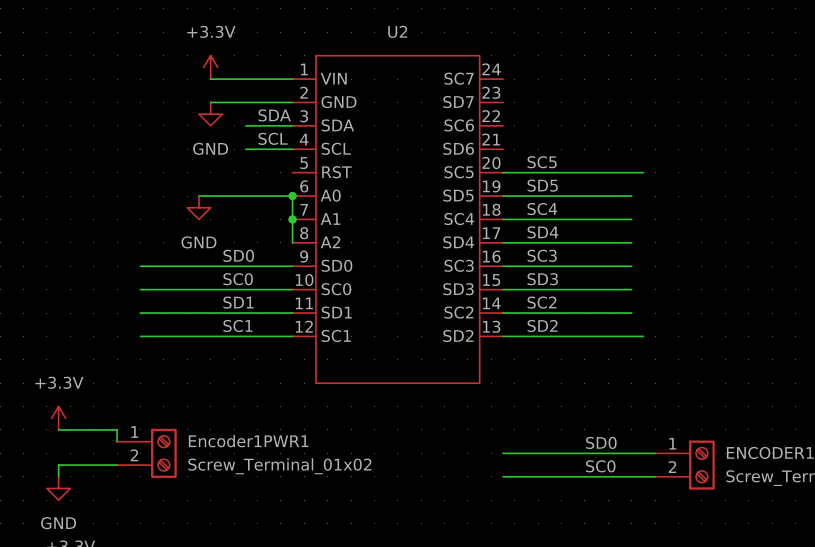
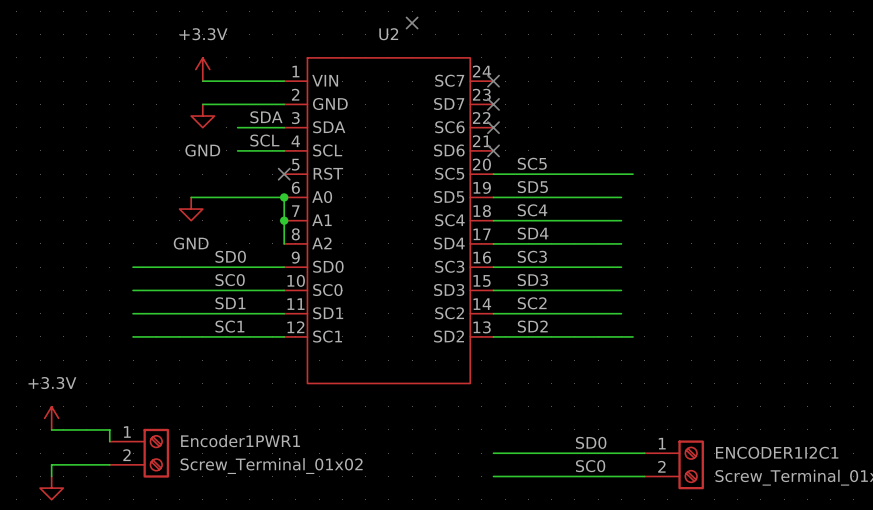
no-connect mark: none -> (412, 23)
no-connect mark: none -> (493, 81)
no-connect mark: none -> (493, 104)
no-connect mark: none -> (493, 127)
no-connect mark: none -> (493, 150)
no-connect mark: none -> (284, 174)

